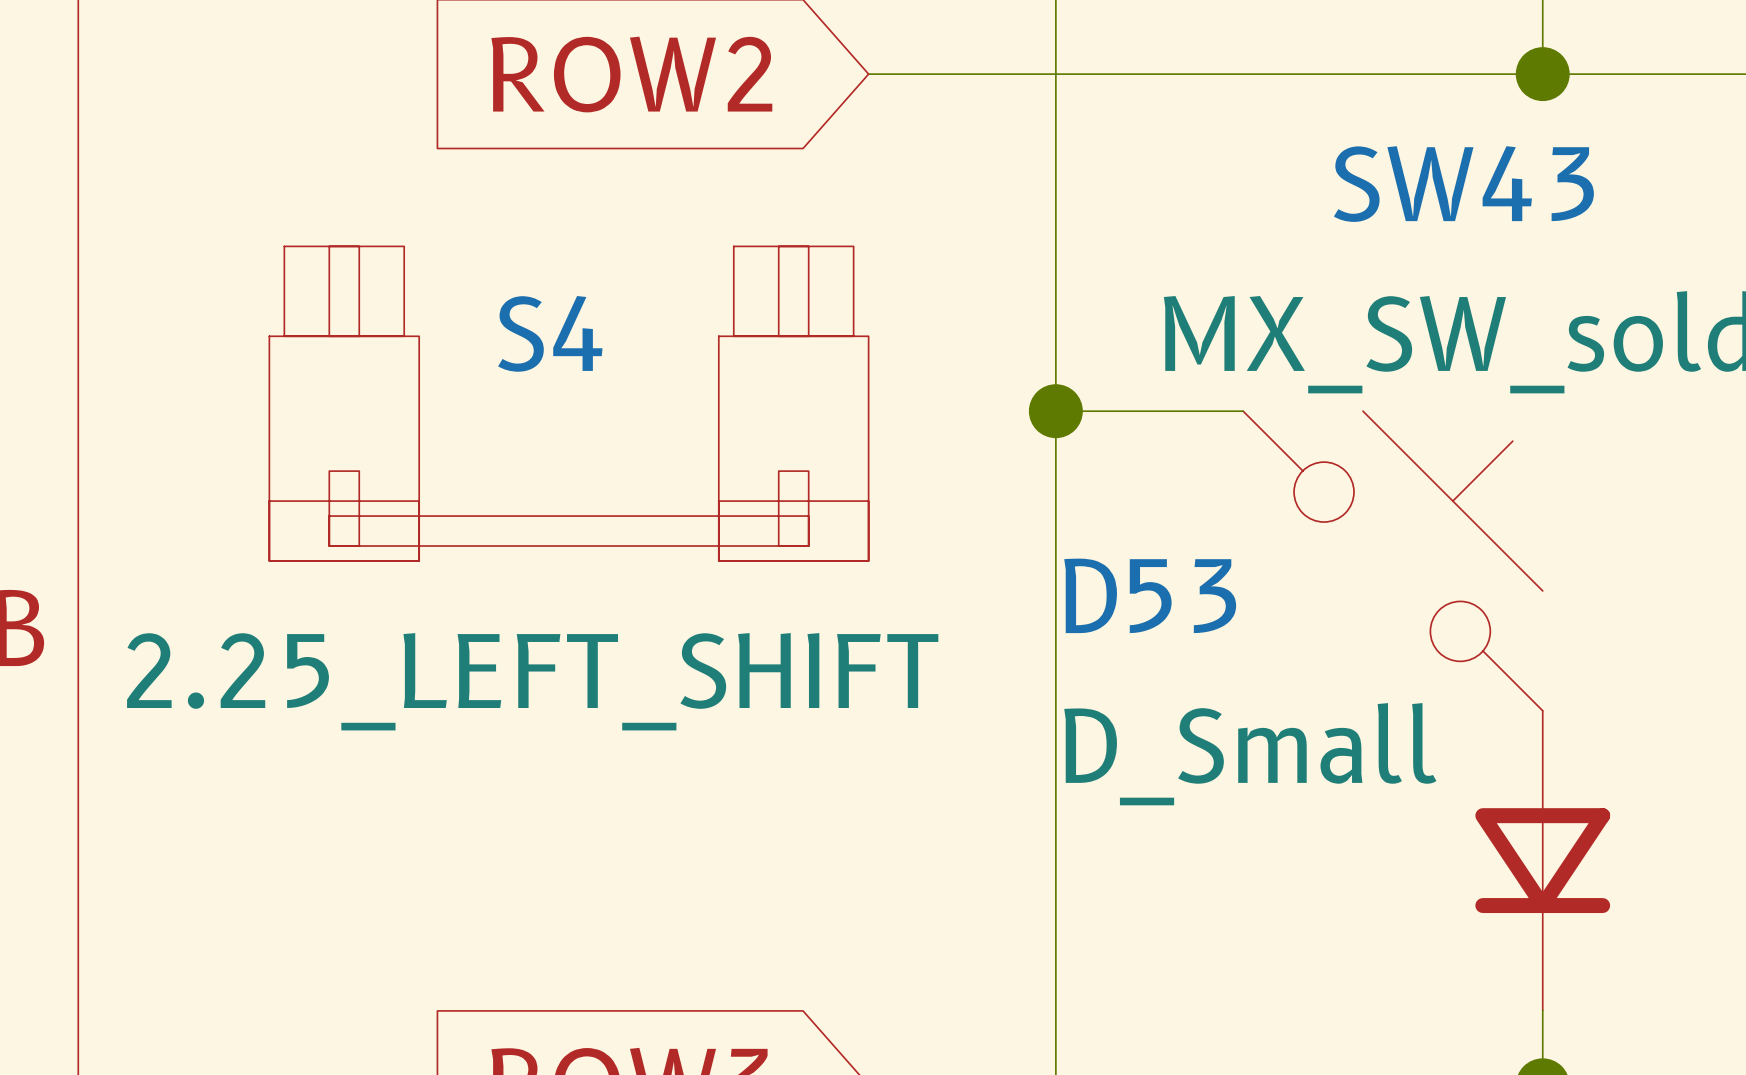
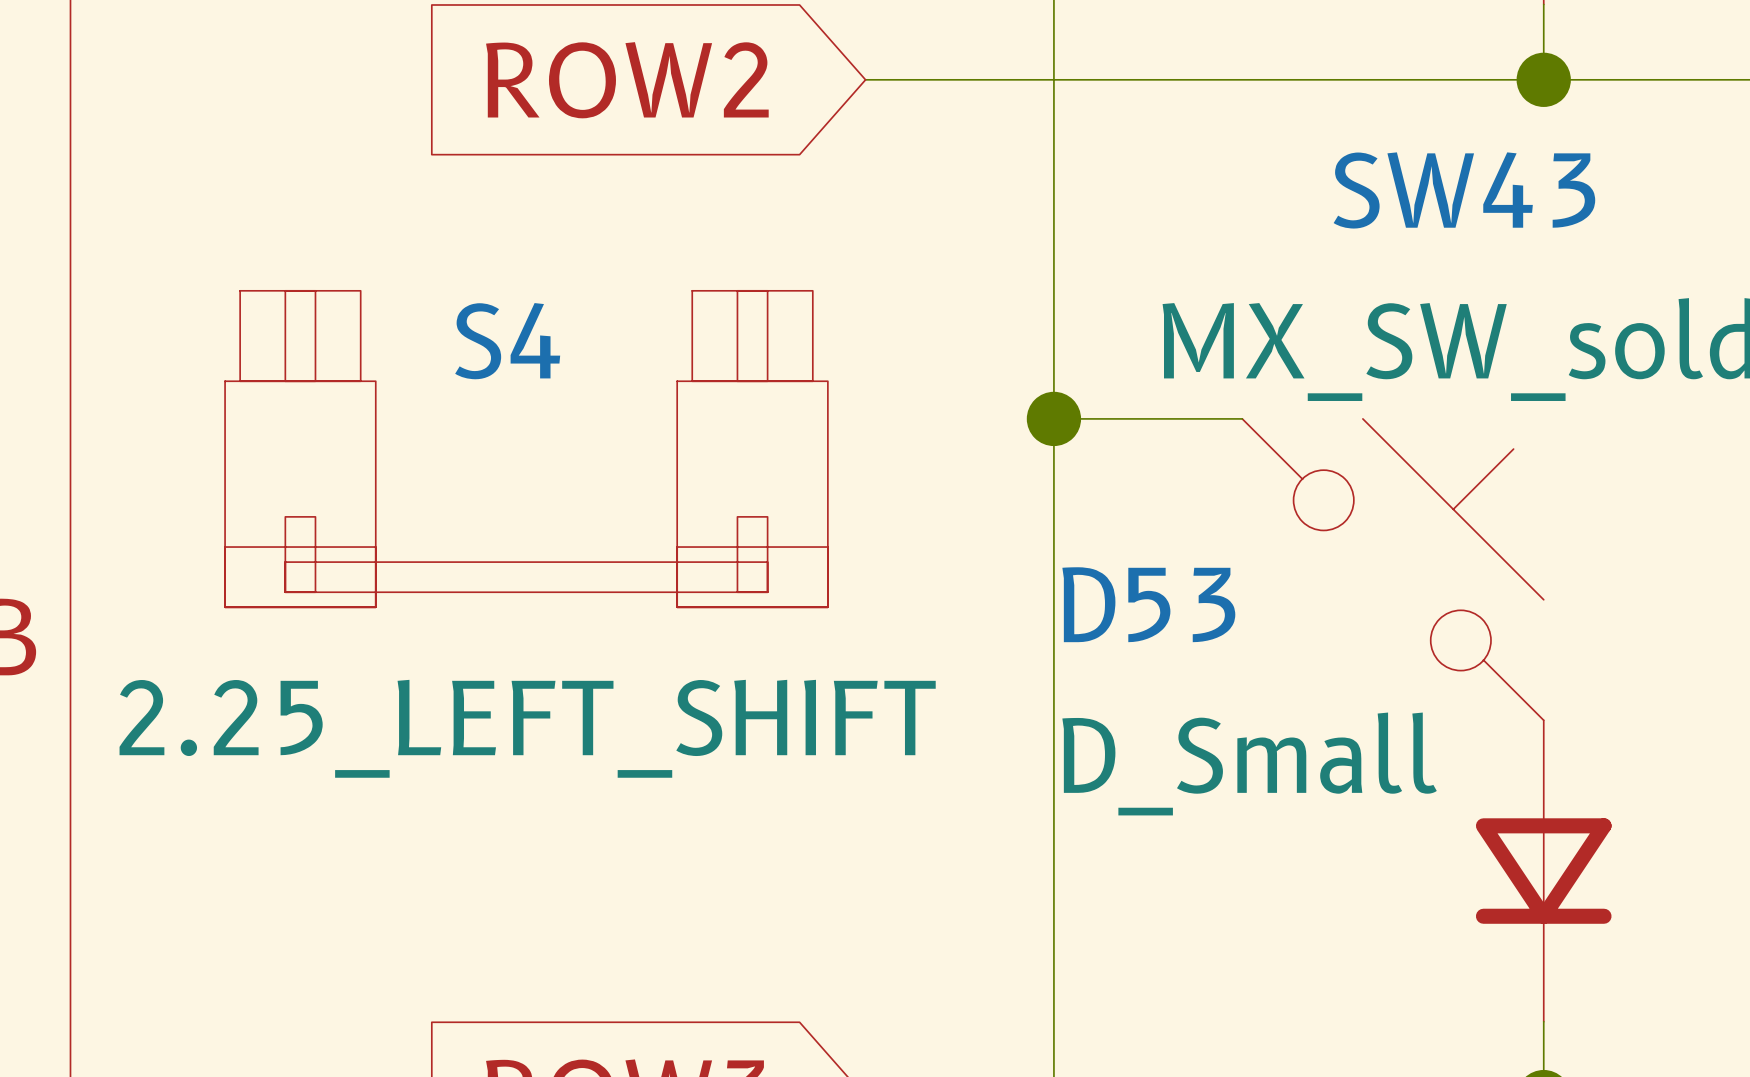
S4 name position: S4 (550, 333) -> S4 (507, 341)
S4 position: (568, 403) -> (526, 449)
S4 value position: 2.25_LEFT_SHIFT (532, 681) -> 2.25_LEFT_SHIFT (527, 728)

